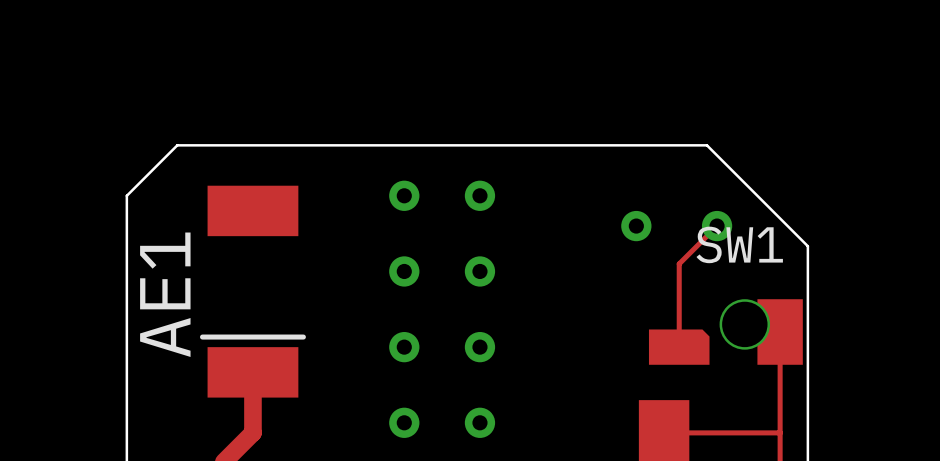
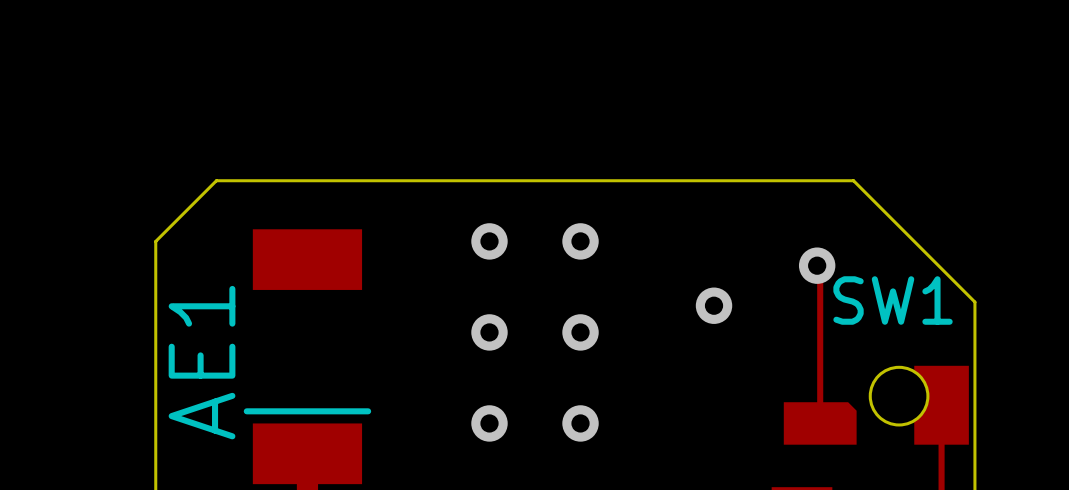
via: none -> (817, 265)
via: (636, 226) -> none
track: (717, 226) (679, 263) -> (817, 265) (820, 268) (820, 323)
via: (717, 226) -> none
via: none -> (714, 305)

